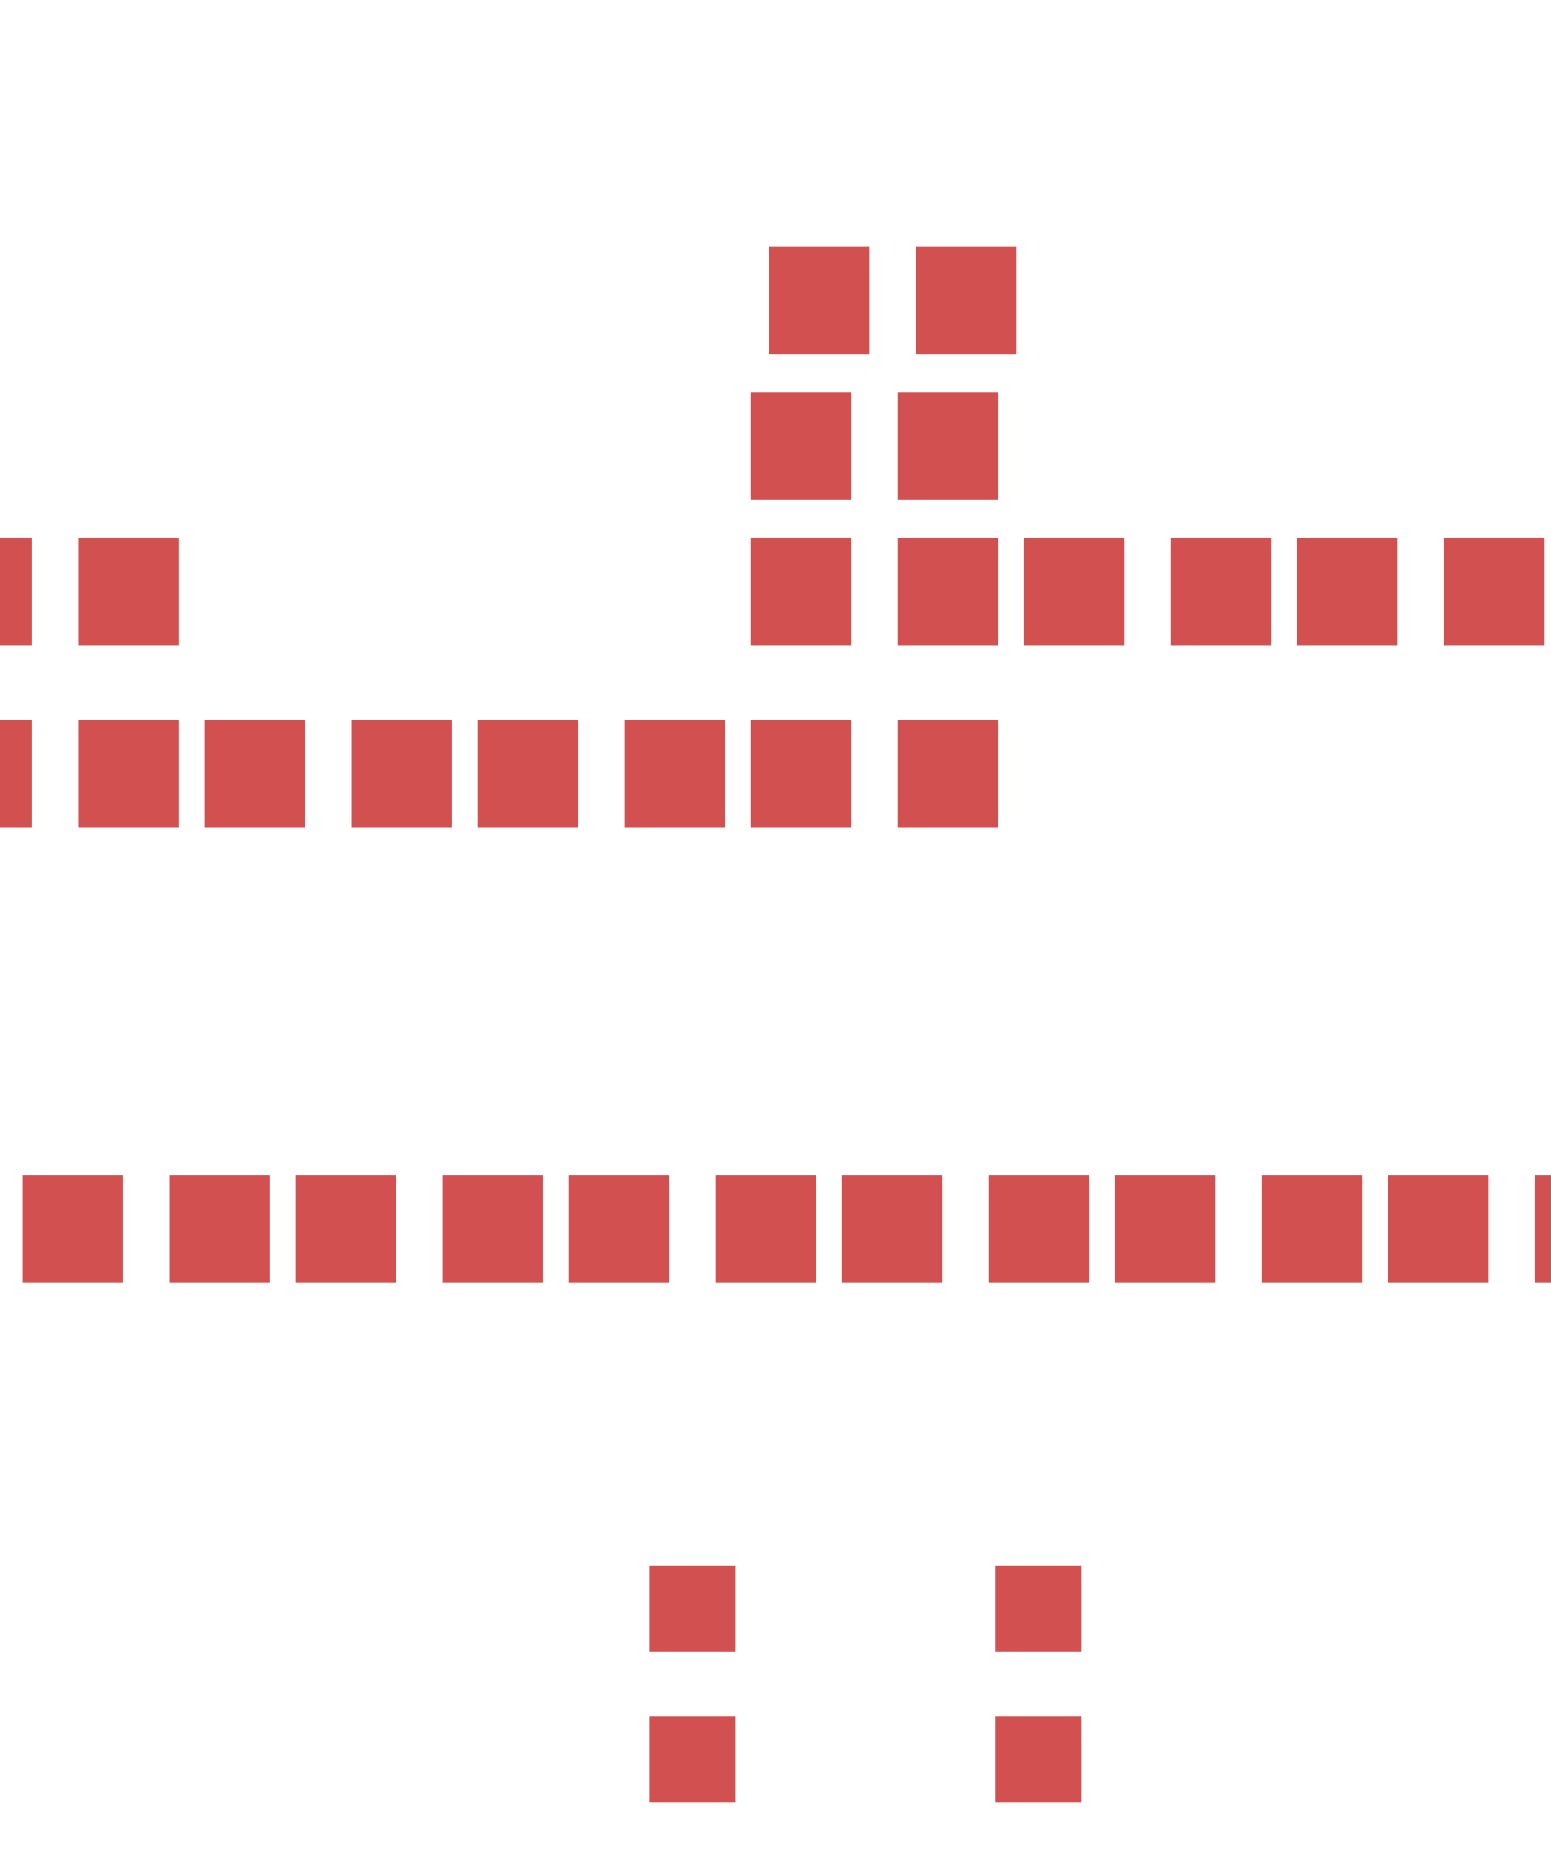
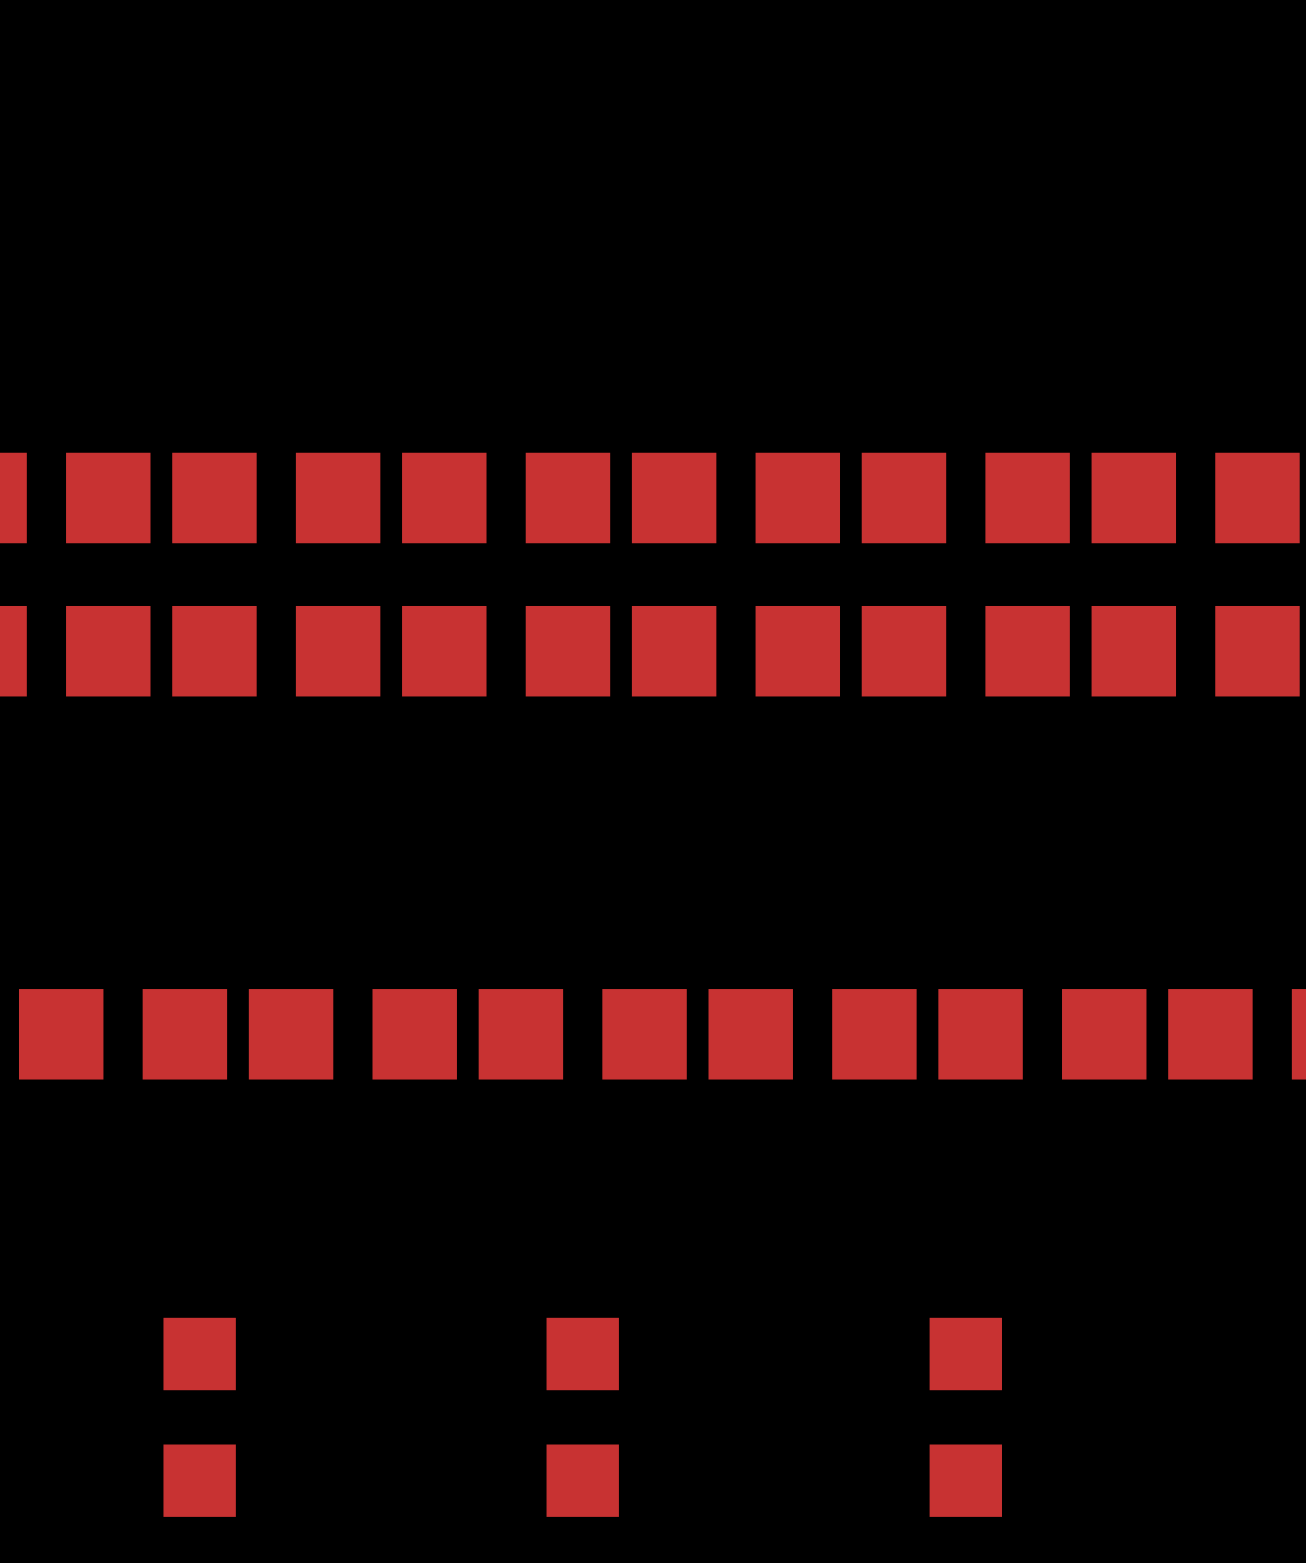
part: (892, 300) -> none
part: (874, 446) -> none
part: none -> (276, 497)
part: none -> (506, 497)
part: none -> (965, 651)
part: none -> (1195, 651)
part: none -> (199, 1417)
part position: (1038, 1684) -> (965, 1417)

